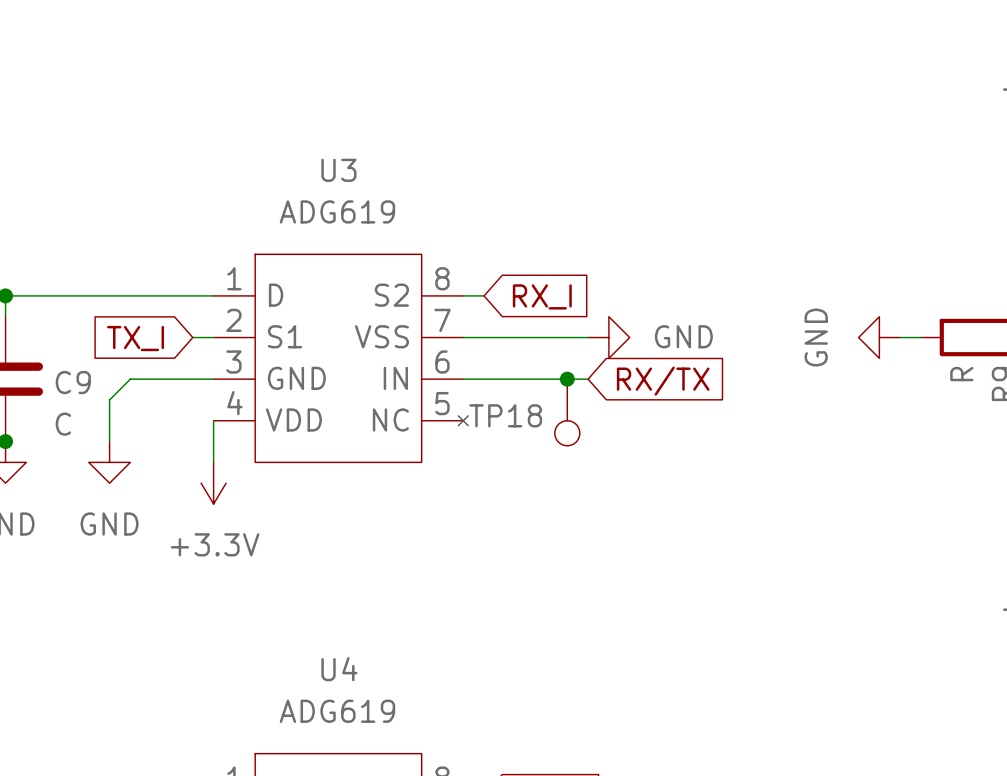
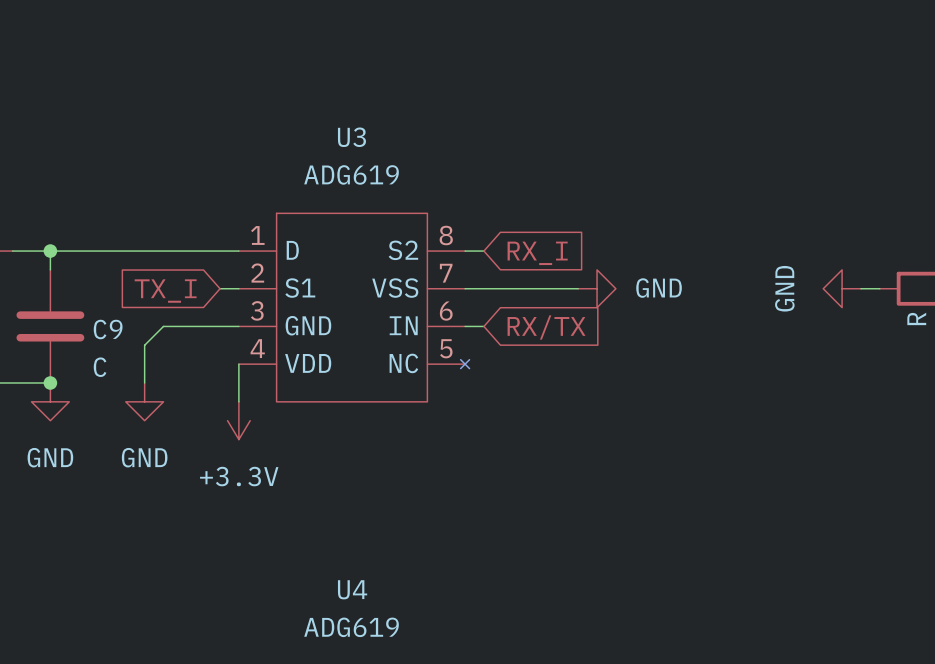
wire: (484, 379) (588, 379) -> none
junction: (567, 379) -> none
global label position: RX/TX (663, 381) -> RX/TX (546, 327)
TP18: (567, 412) -> none

